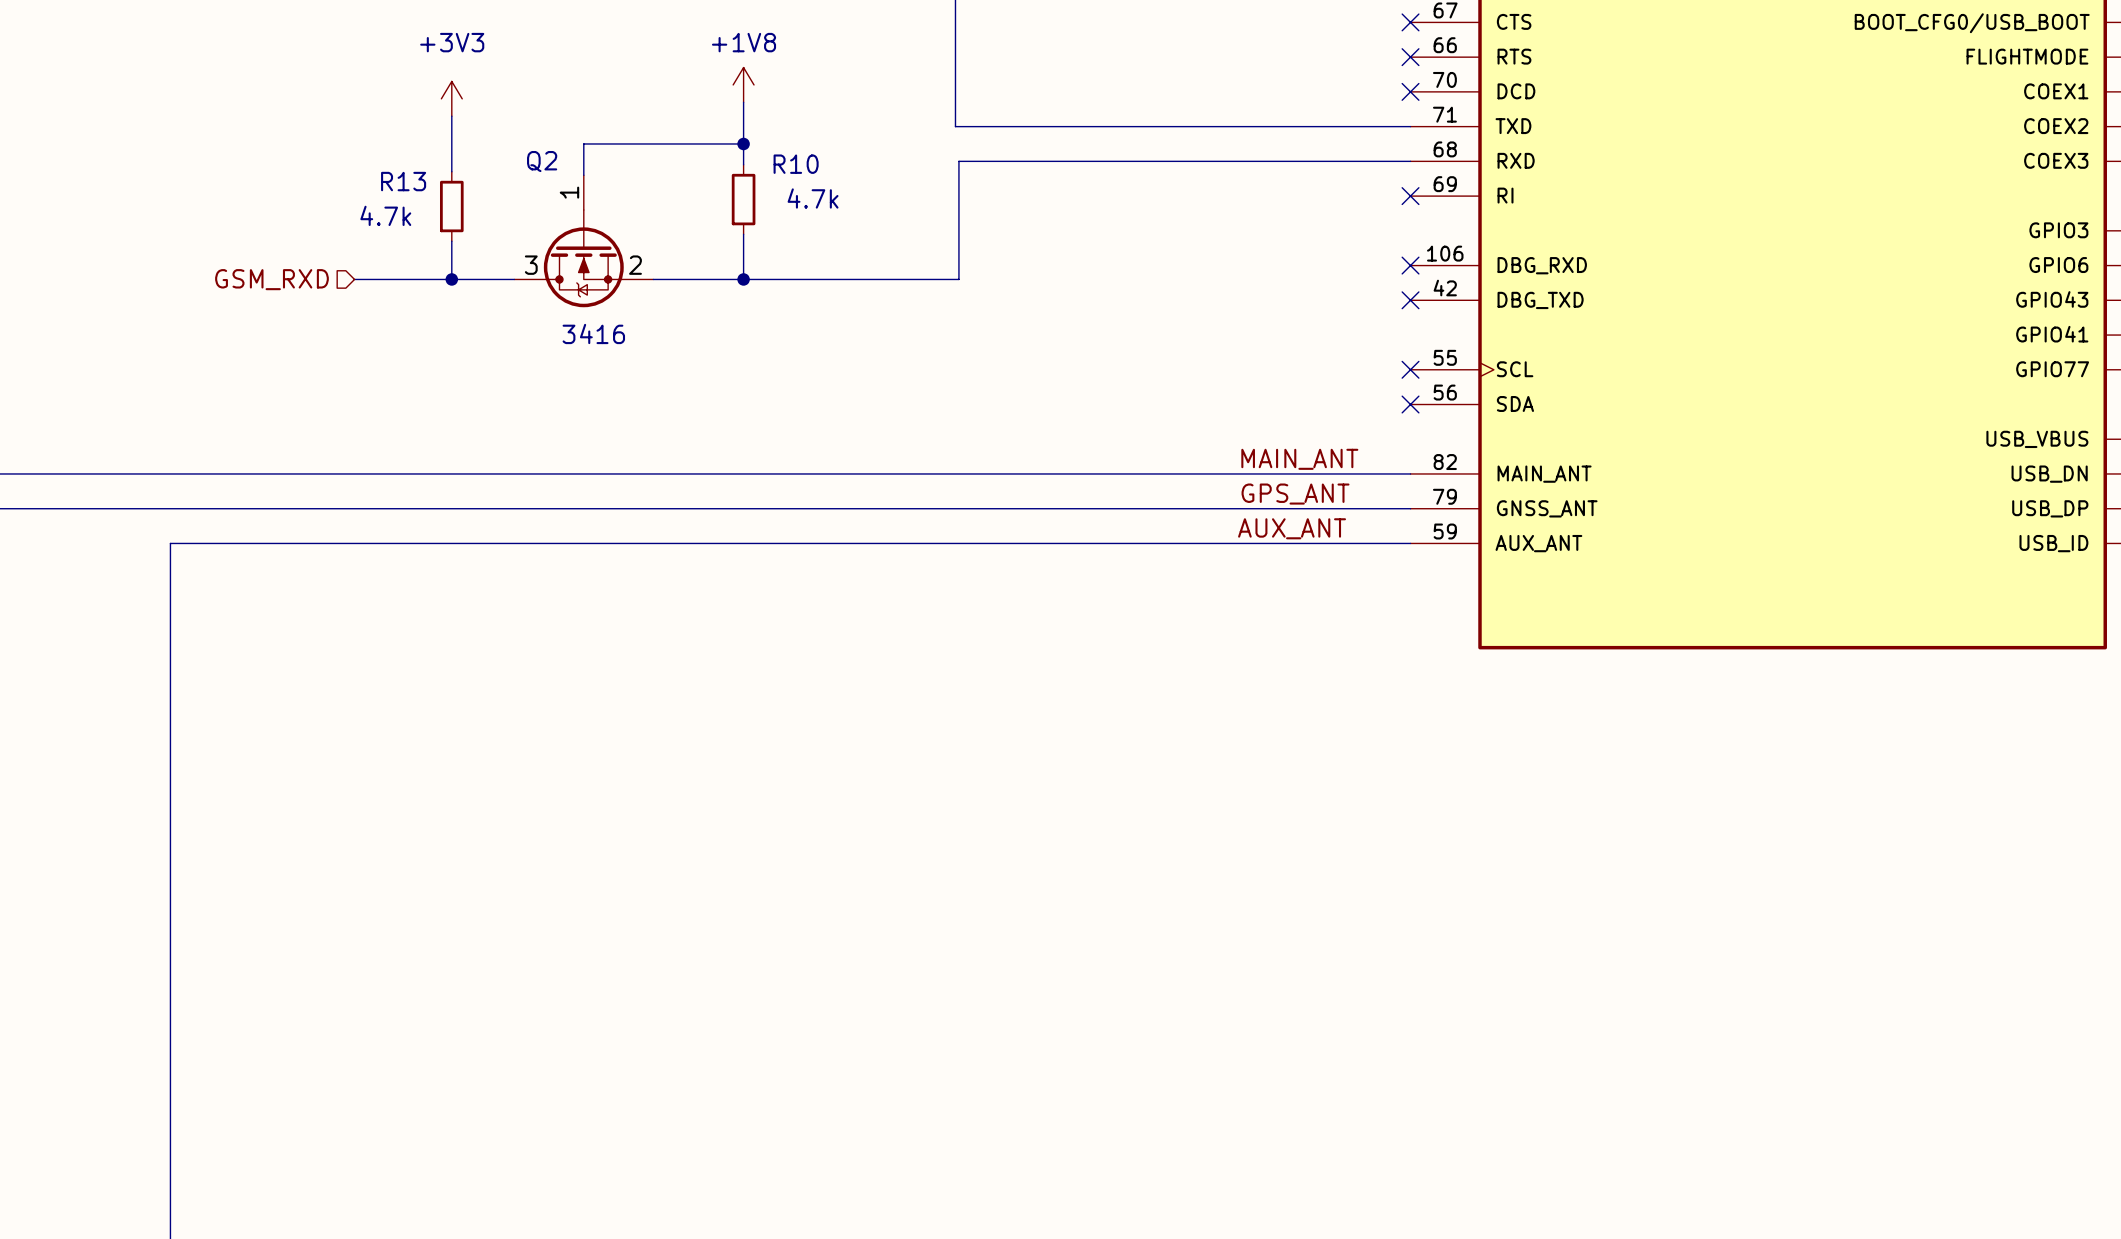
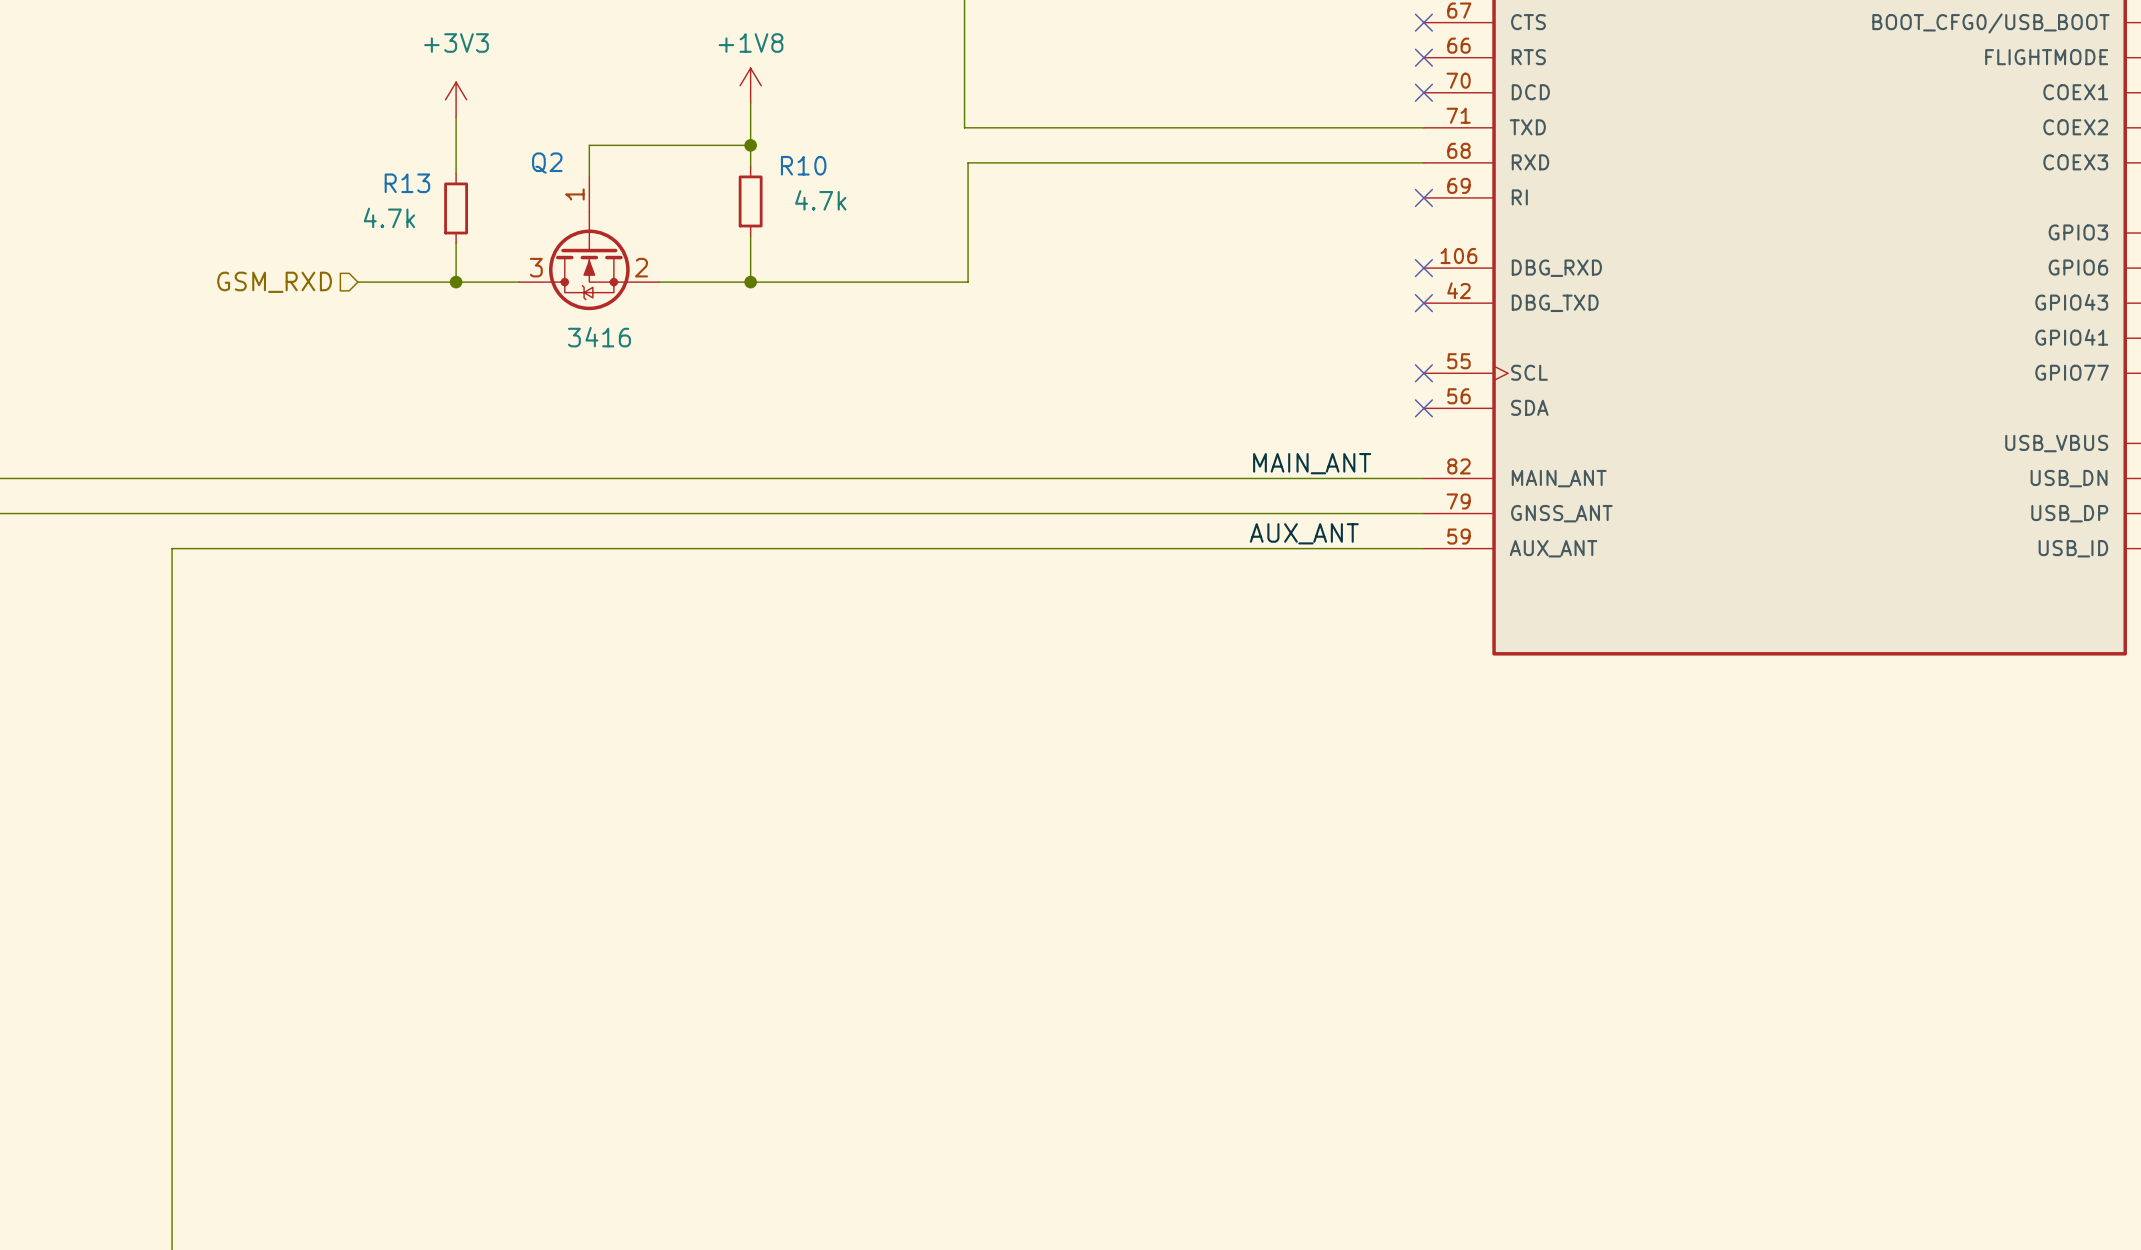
label: GPS_ANT (1295, 494) -> none

